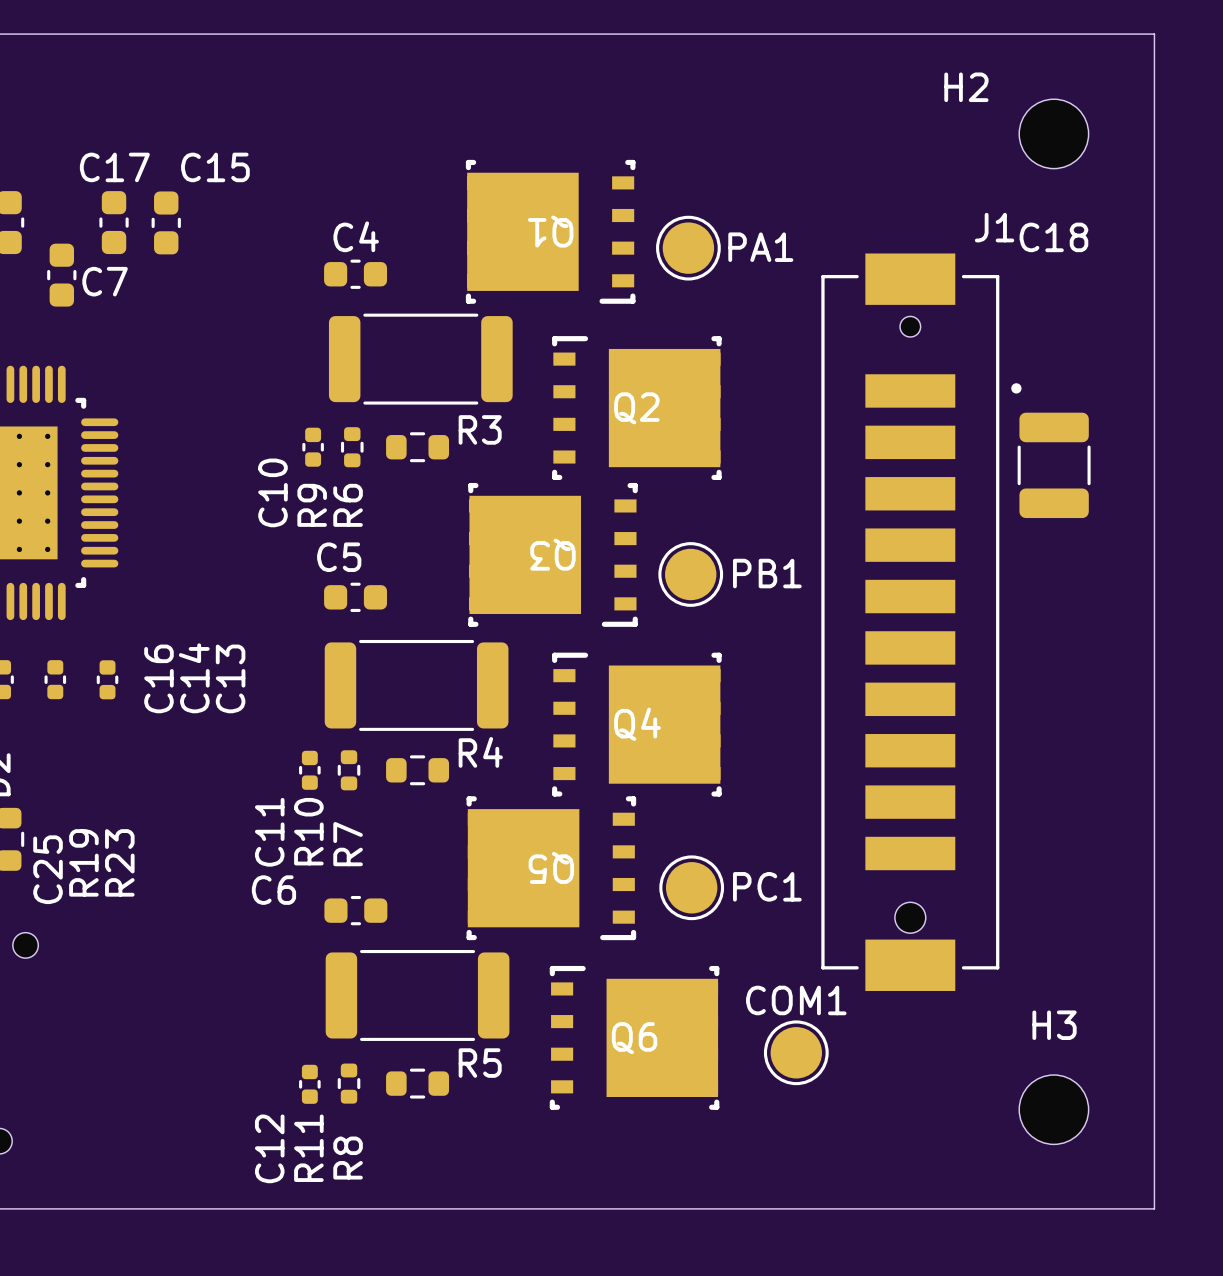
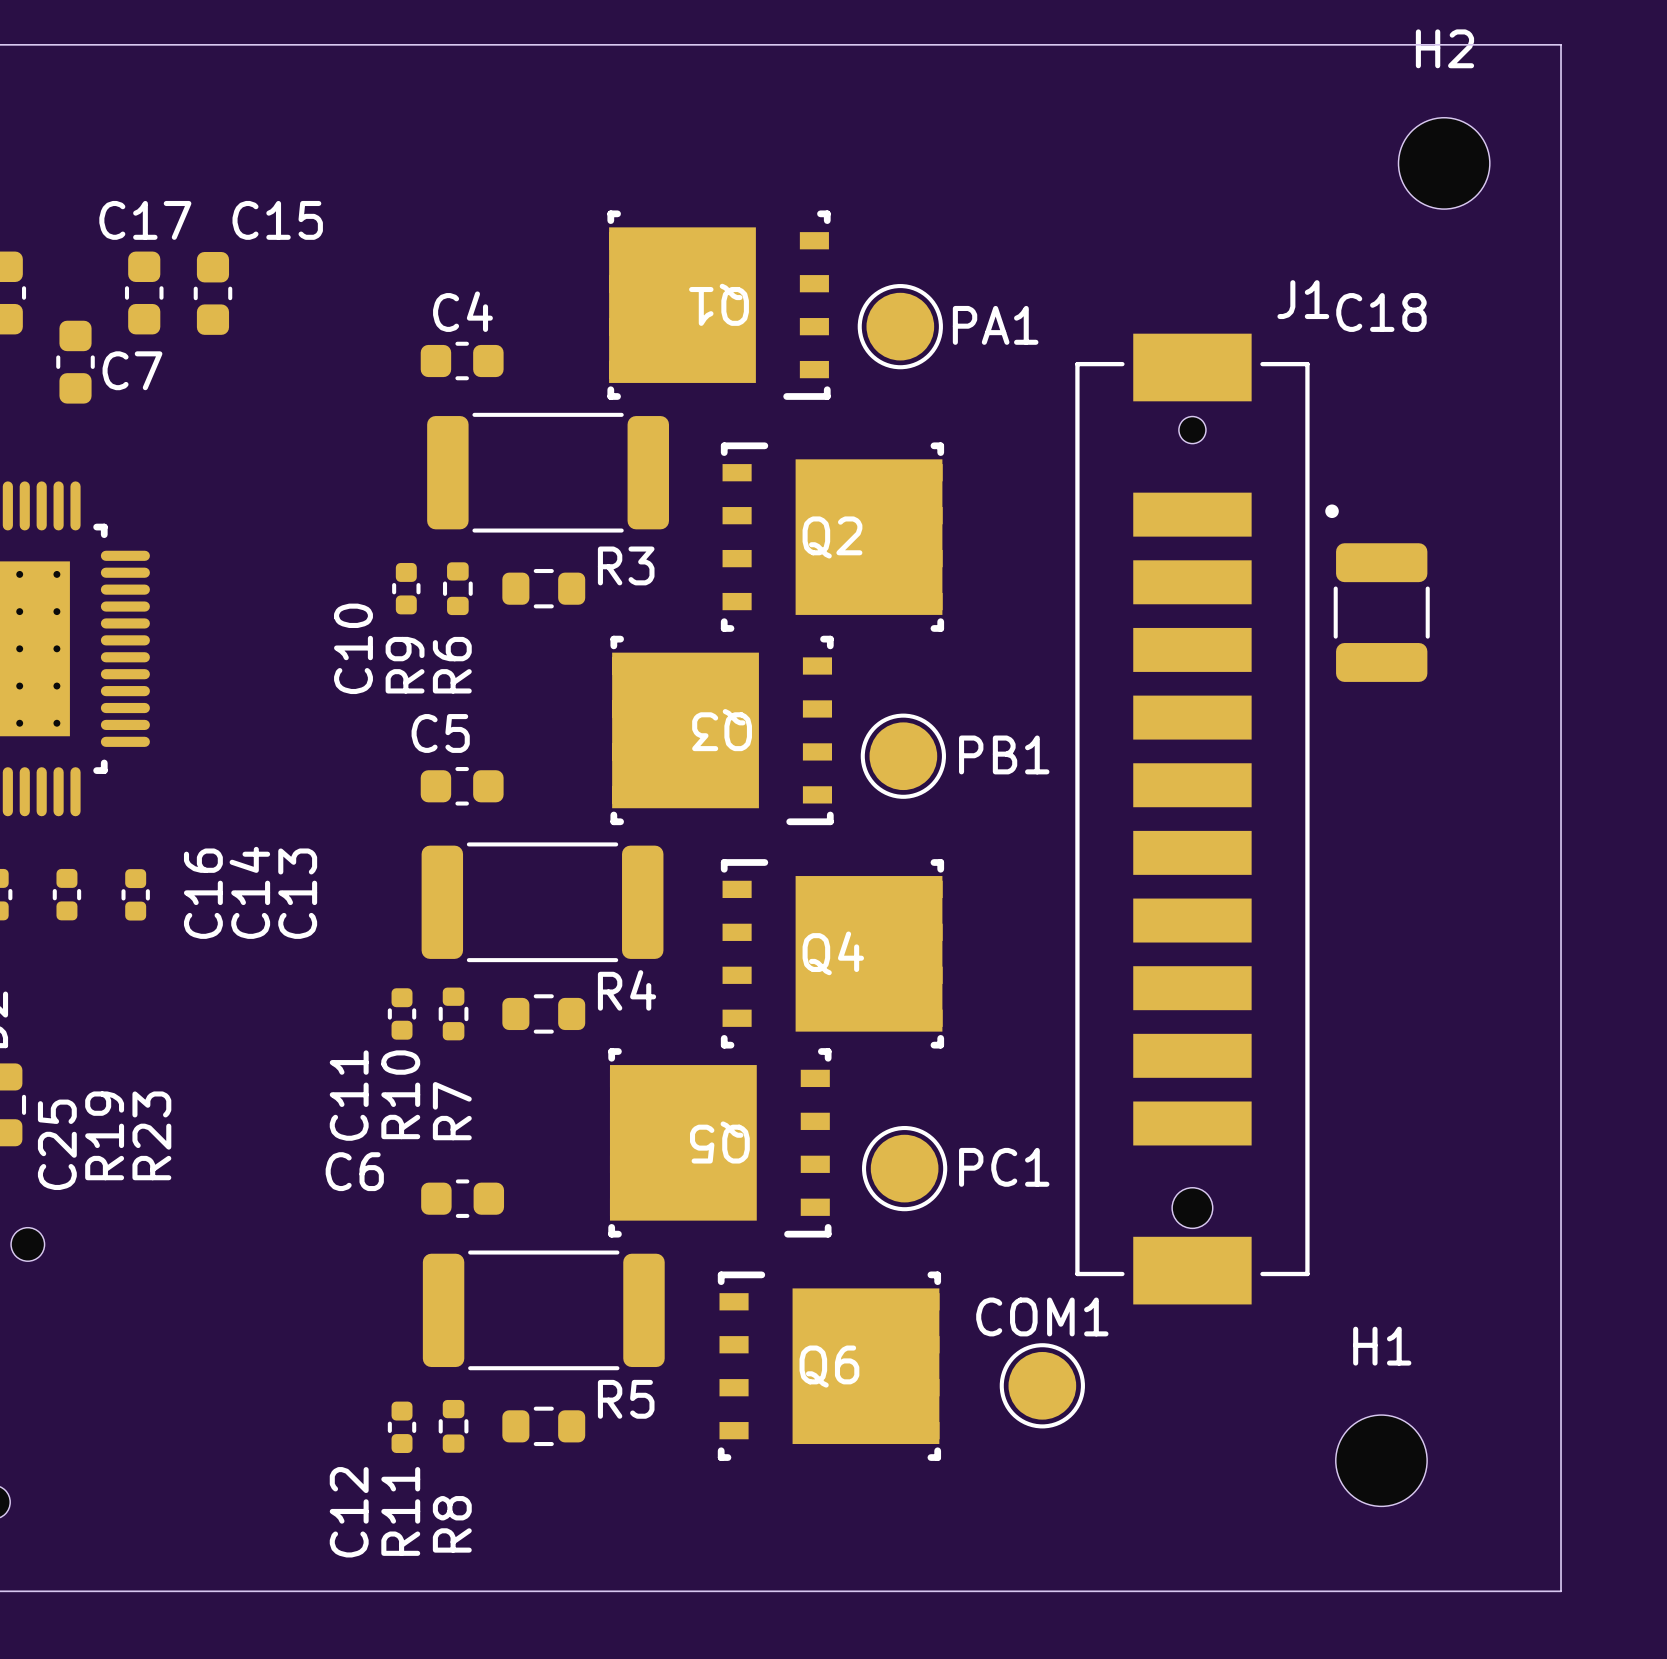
board edge: (1154, 34) (1154, 1208) -> (1513, 44) (1561, 44) (1561, 1591) (1513, 1591)
H2 name position: H2 (966, 87) -> H2 (1444, 48)
H2 position: (1053, 133) -> (1444, 163)
H3 name: H3 (1054, 1025) -> H1 (1382, 1346)

